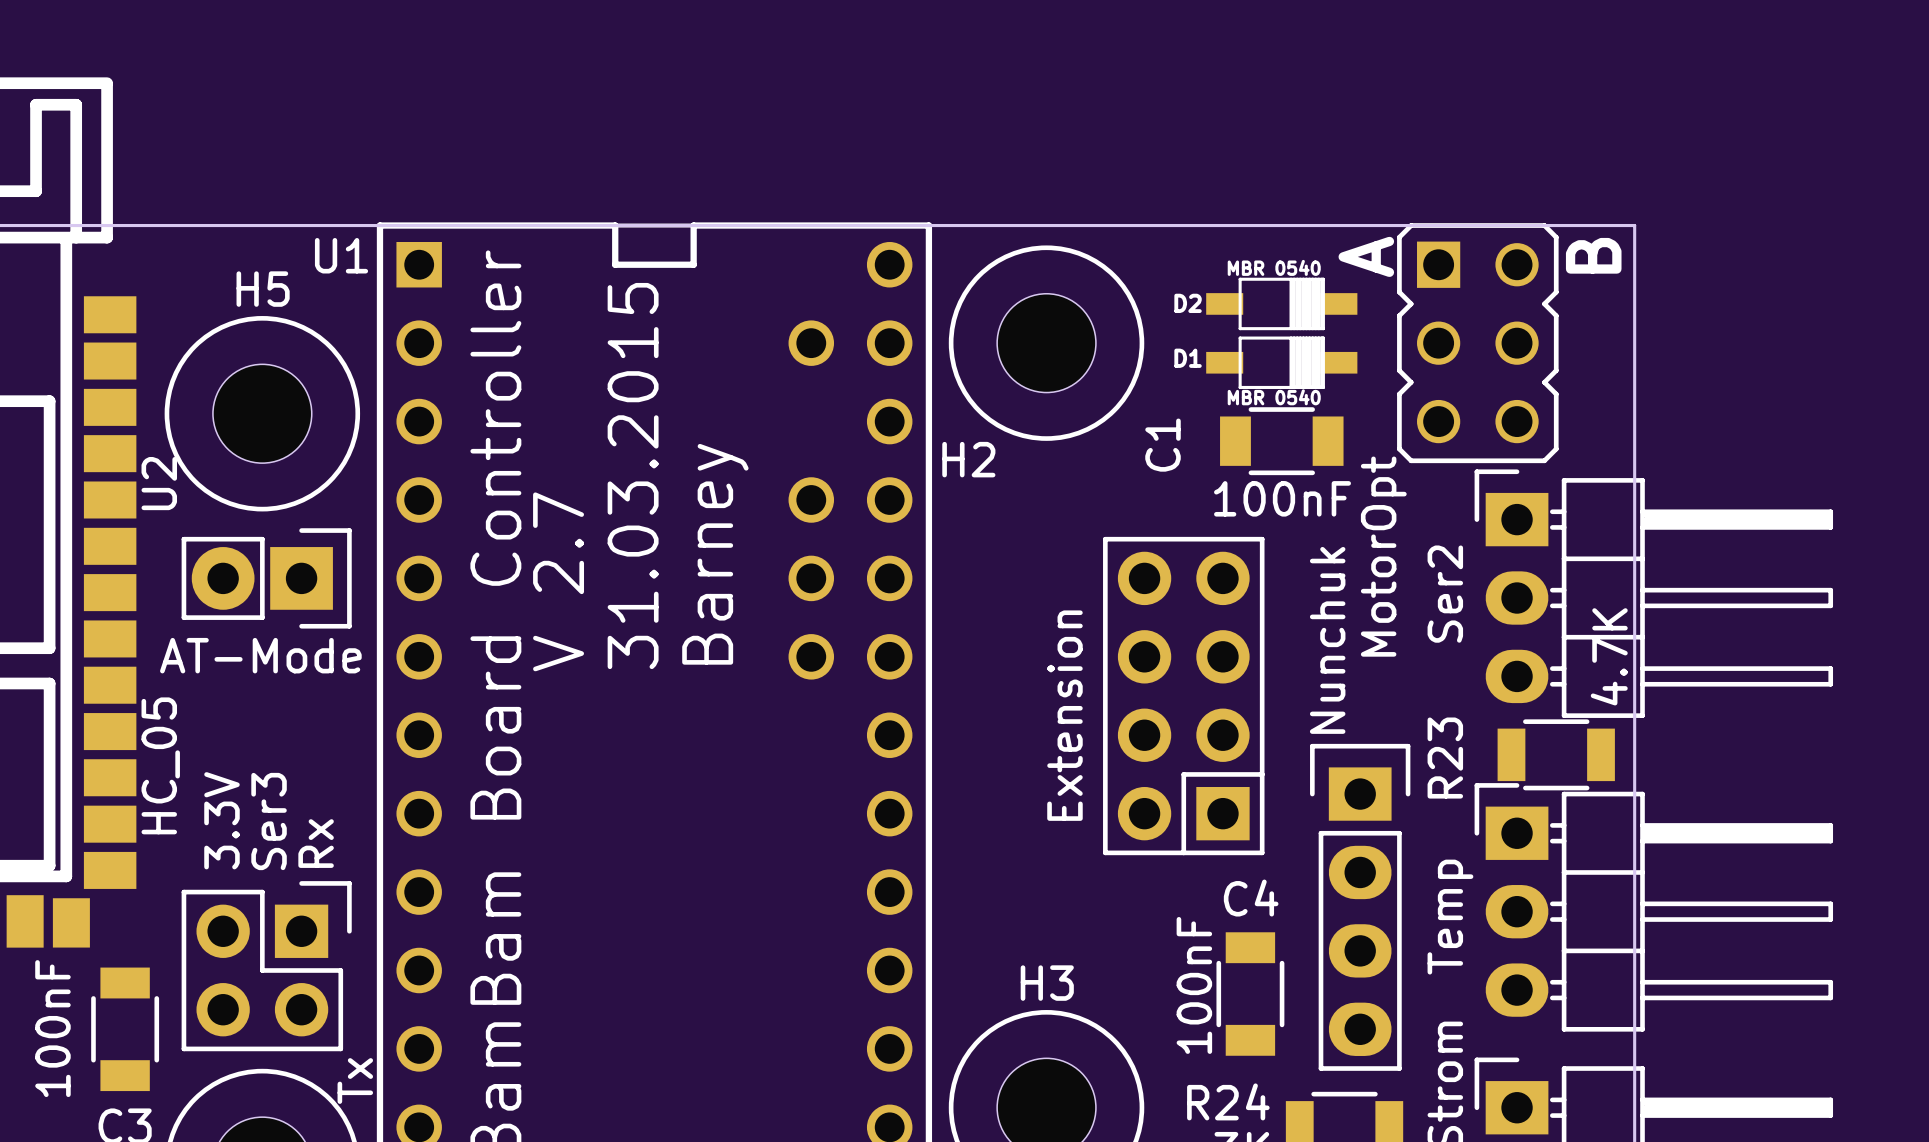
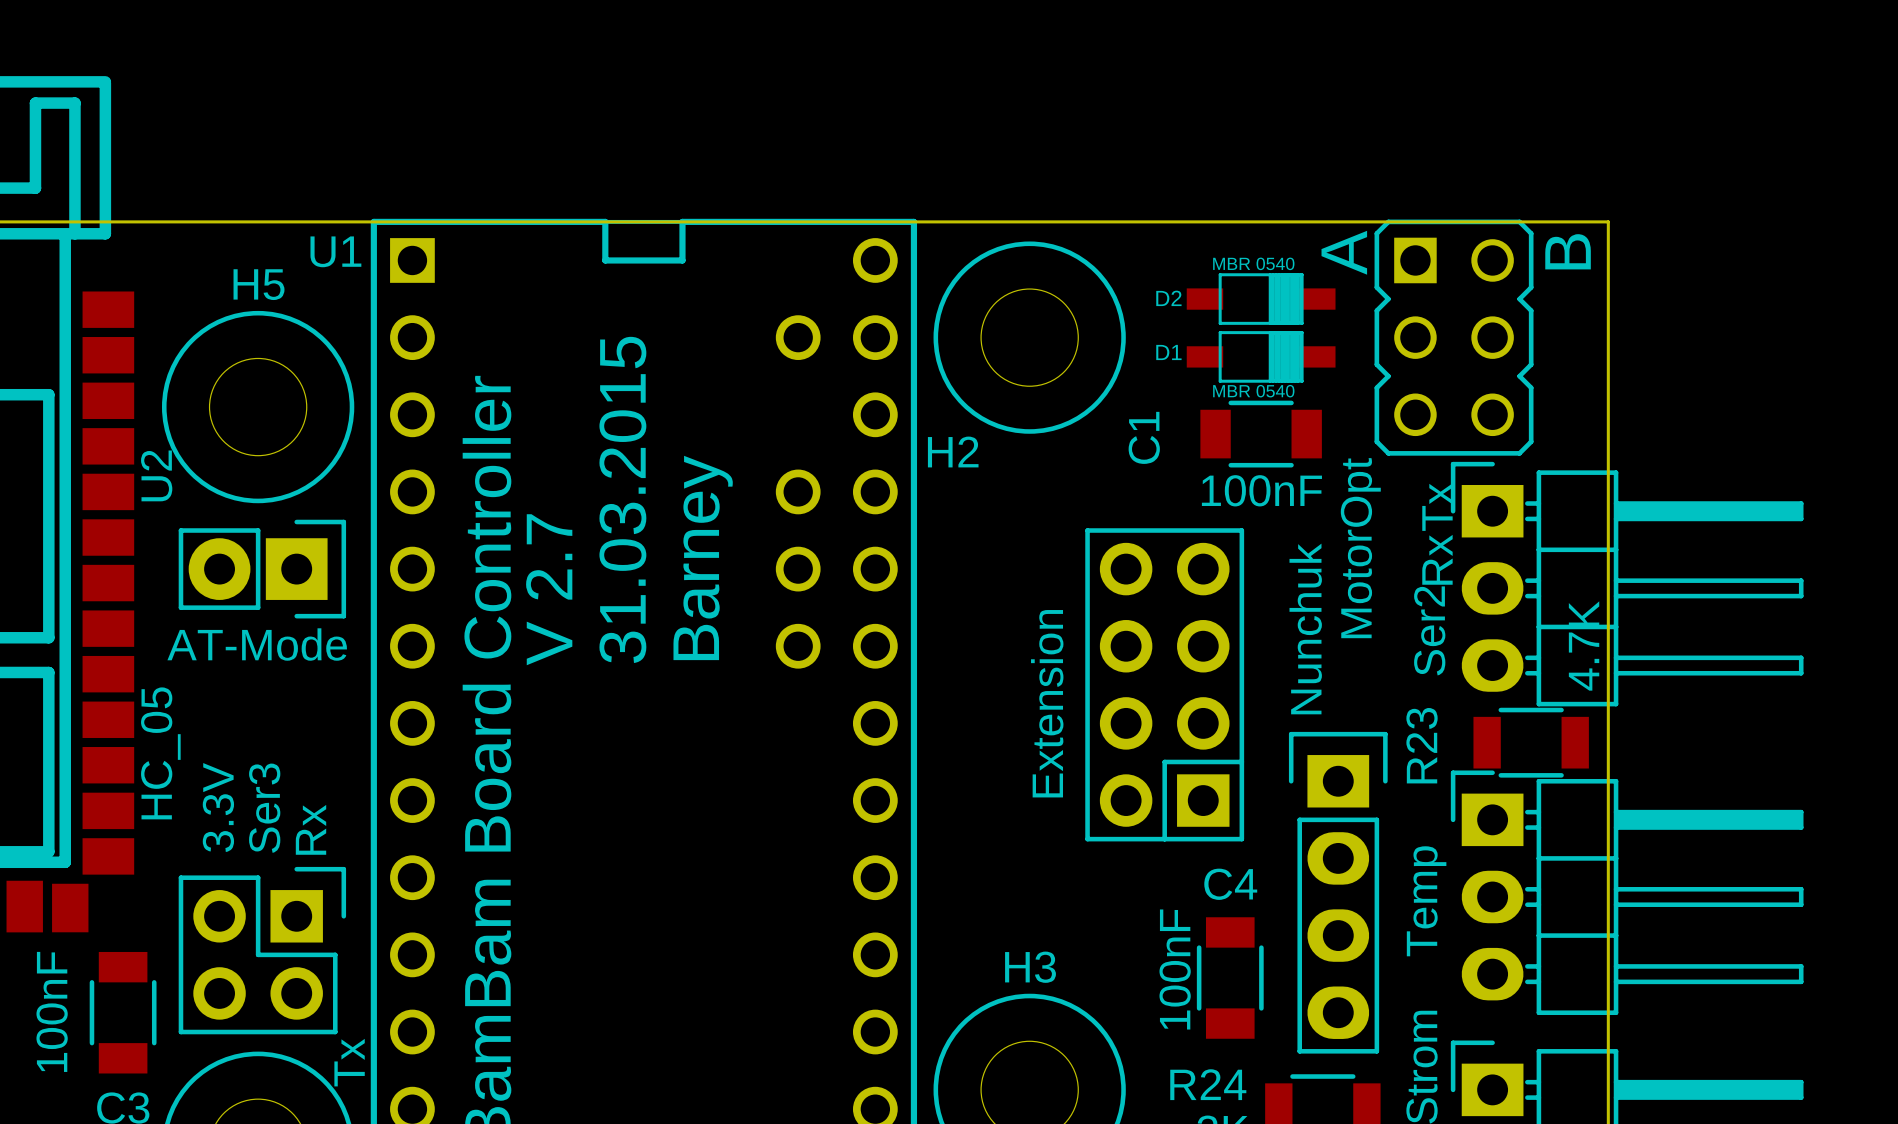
text: none -> Tx (1437, 507)
text: none -> Rx (1437, 559)
Ser2 name position: Ser2 (1445, 594) -> Ser2 (1429, 630)

